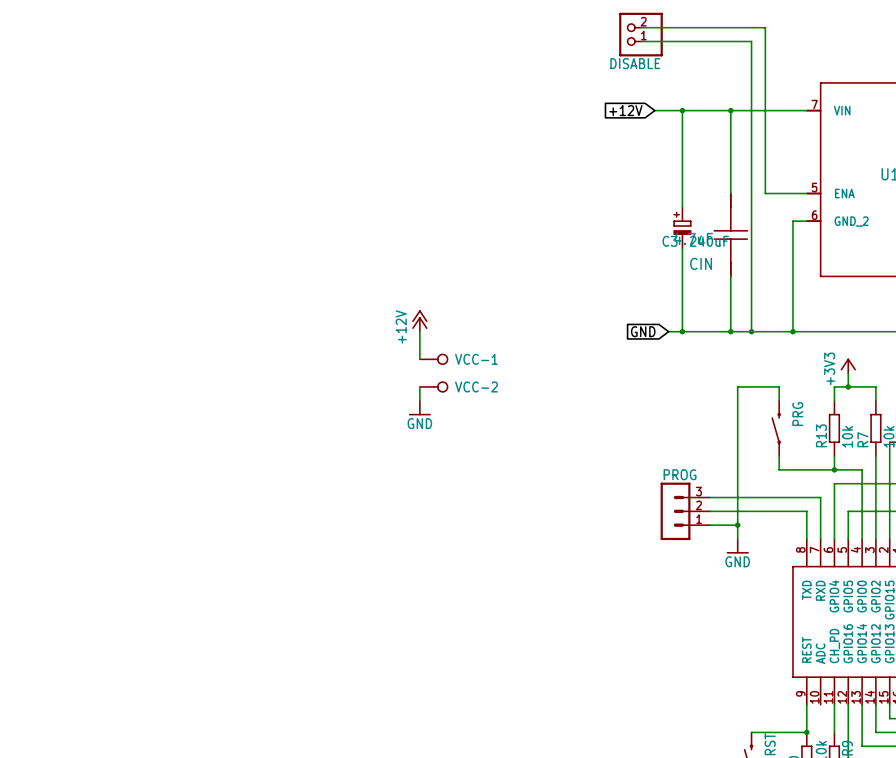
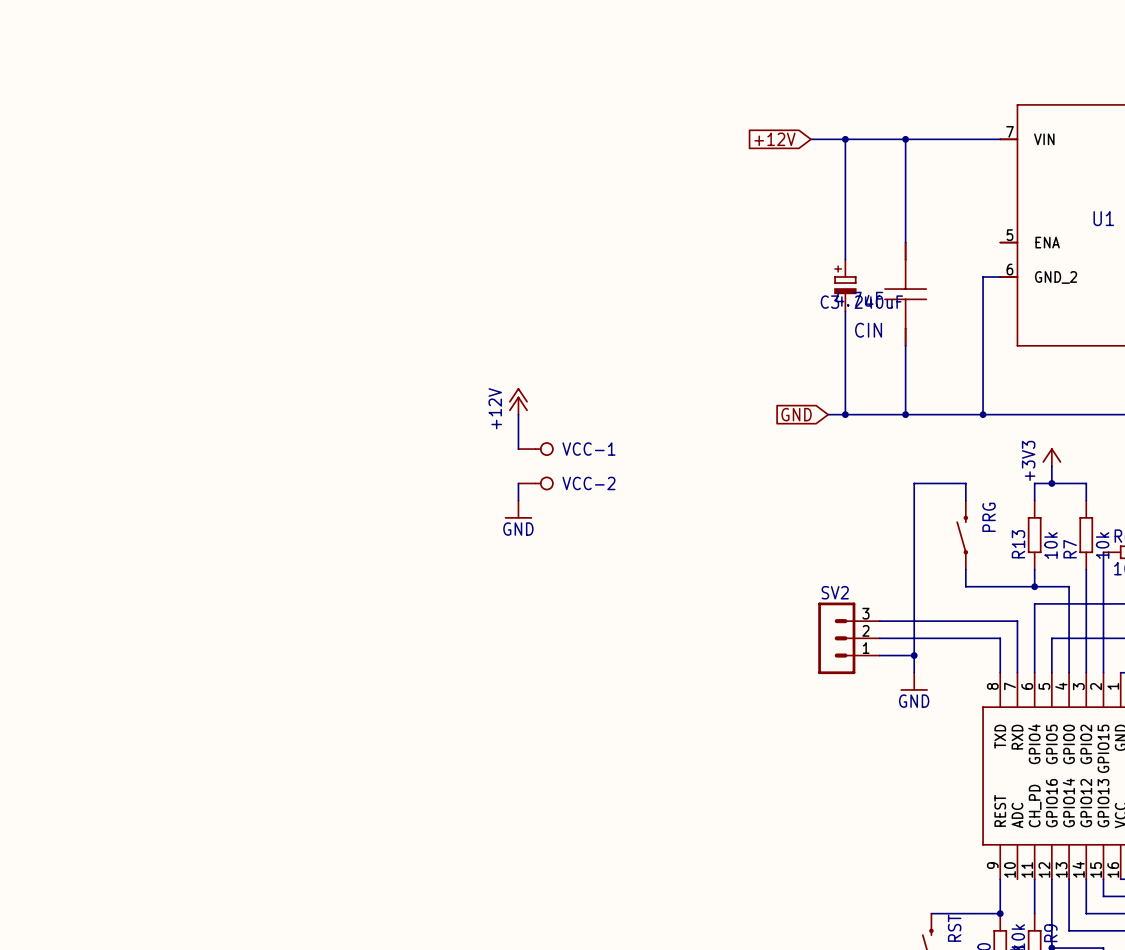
wire: (640, 27) (765, 27) (765, 193) (806, 193) -> none
DISABLE: (640, 34) -> none
wire: (640, 41) (751, 41) (751, 331) -> none
junction: (751, 331) -> none
PROG name: PROG (680, 474) -> SV2 (835, 592)

